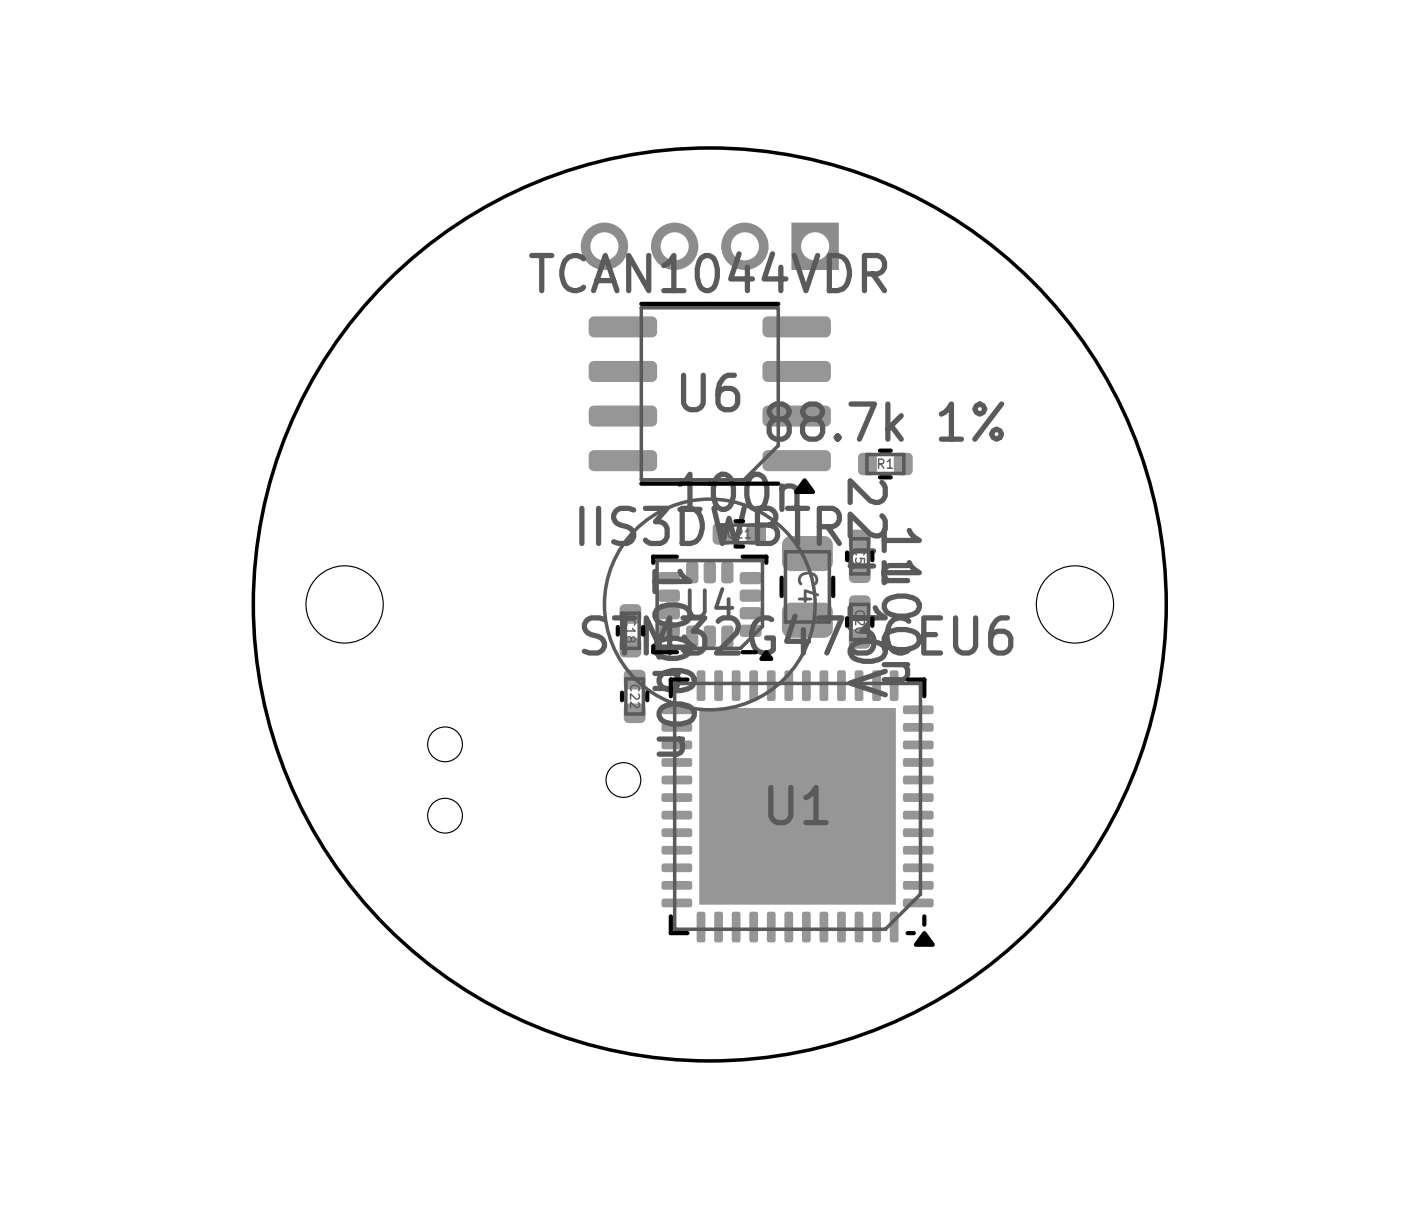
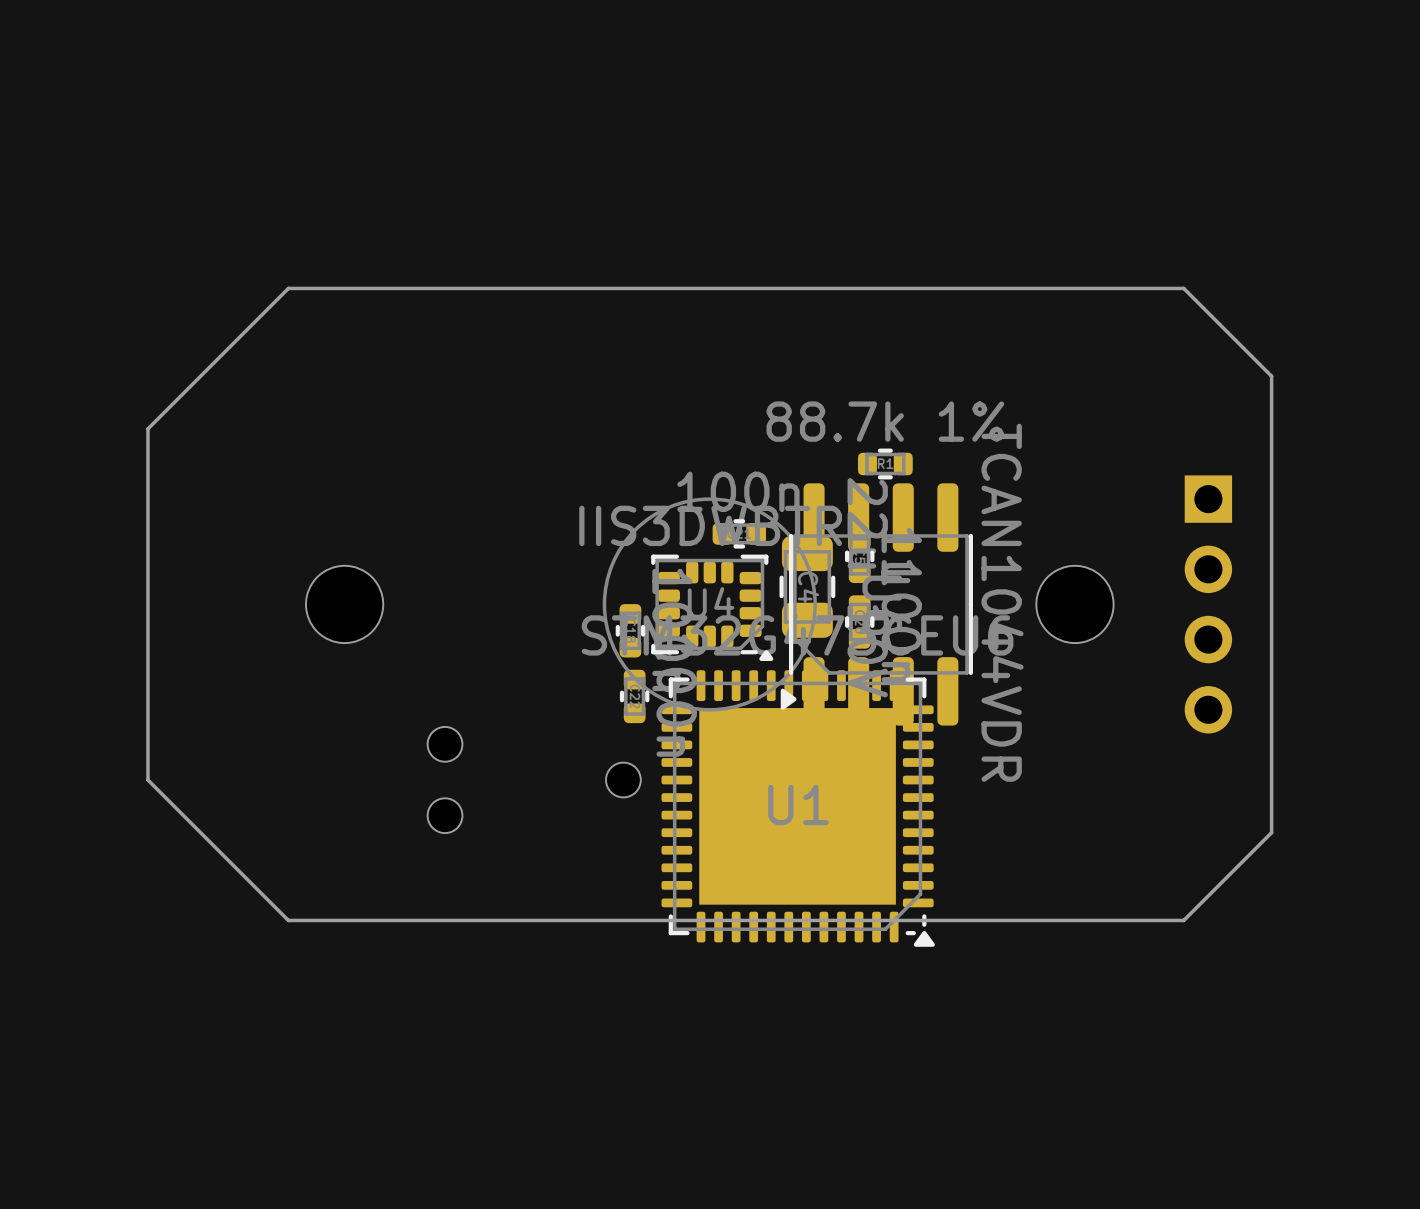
round board edge: [251, 146, 1169, 1063] -> none
part rotation: 0° (709, 246) -> 90° counterclockwise (1208, 604)
part position: (709, 246) -> (1208, 604)
board edge: none -> (1183, 288) (288, 288) (147, 428) (147, 780) (288, 920) (1183, 920) (1271, 832) (1271, 376) (1183, 288)
U6 rotation: 0° (709, 397) -> 90° clockwise (876, 604)
U6 position: (709, 397) -> (876, 604)

